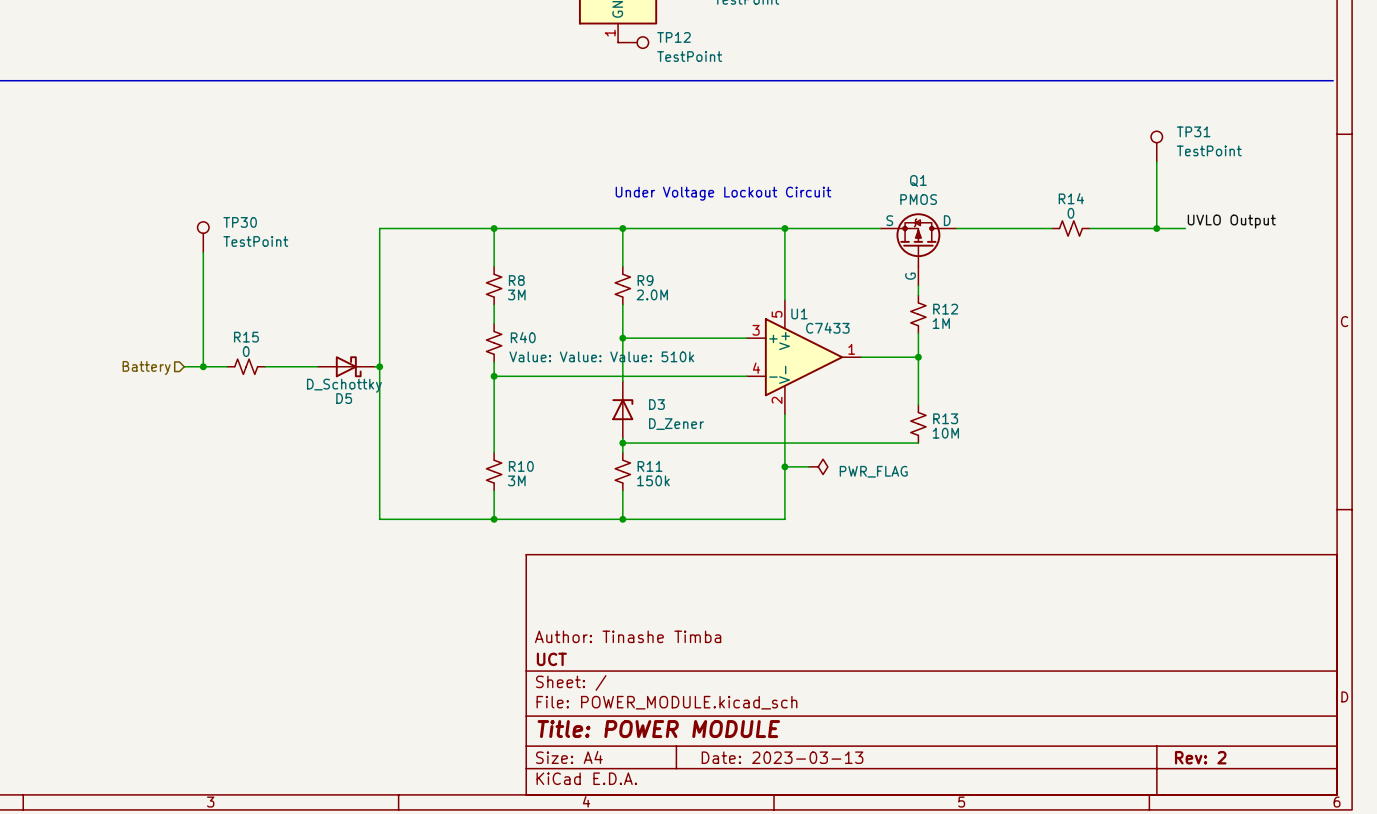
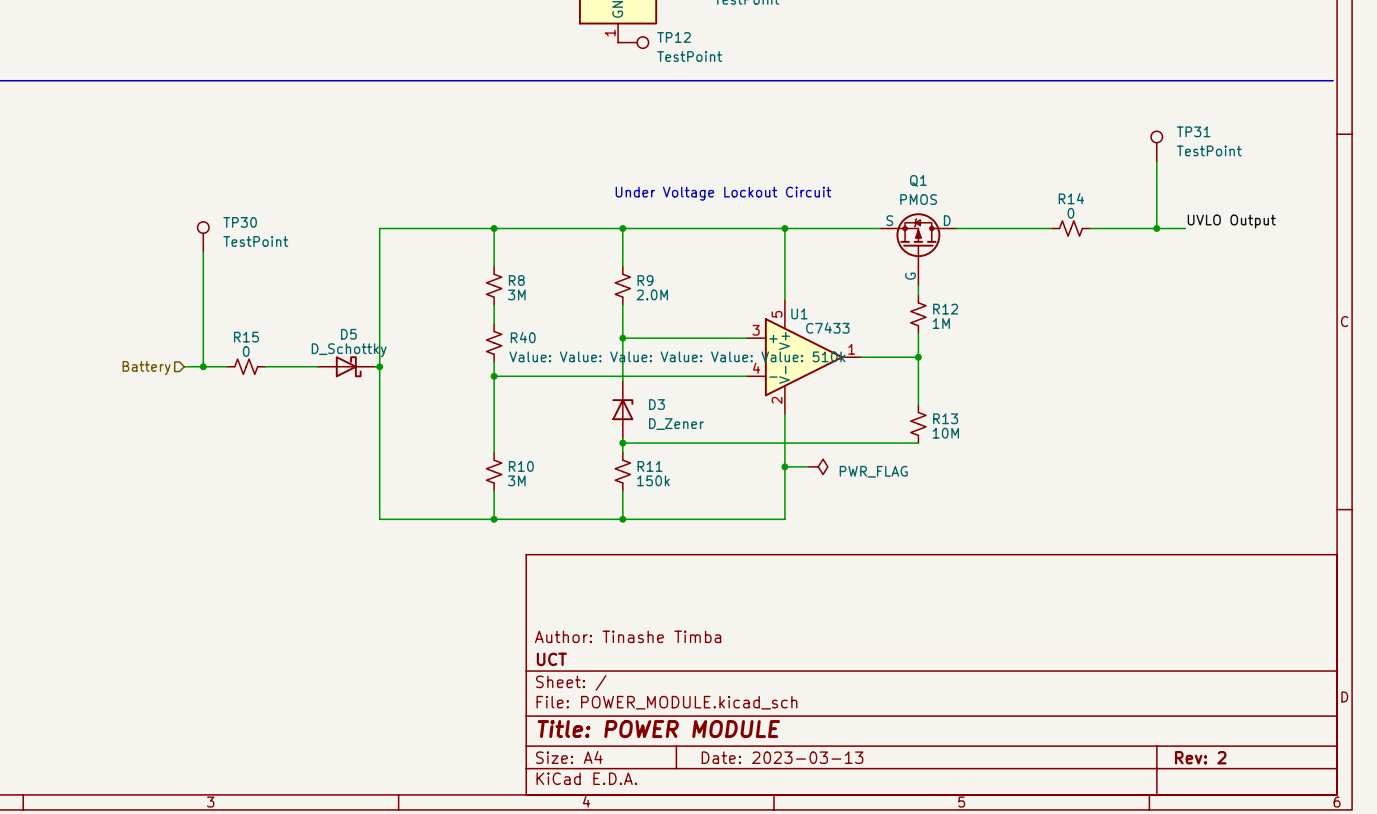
R40 value: Value: Value: Value: 510k (601, 356) -> Value: Value: Value: Value: Value: Value: 510k (677, 356)
D5 value position: D_Schottky (344, 385) -> D_Schottky (349, 350)
D5 name position: D5 (344, 398) -> D5 (348, 334)

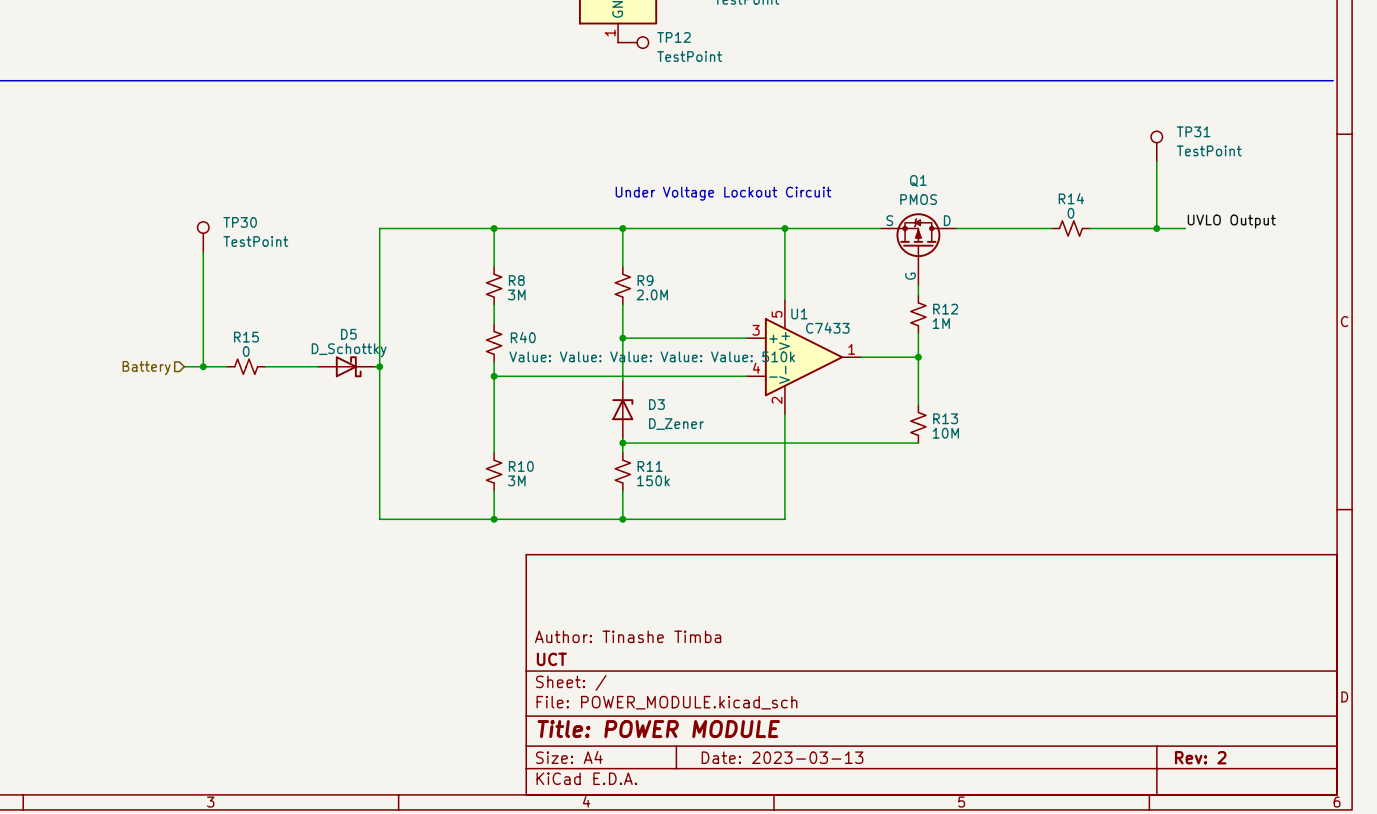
R40 value: Value: Value: Value: Value: Value: Value: 510k (677, 356) -> Value: Value: Value: Value: Value: 510k (652, 356)
wire: (784, 466) (808, 466) -> none
junction: (784, 466) -> none
power symbol: PWR_FLAG (818, 466) -> none

